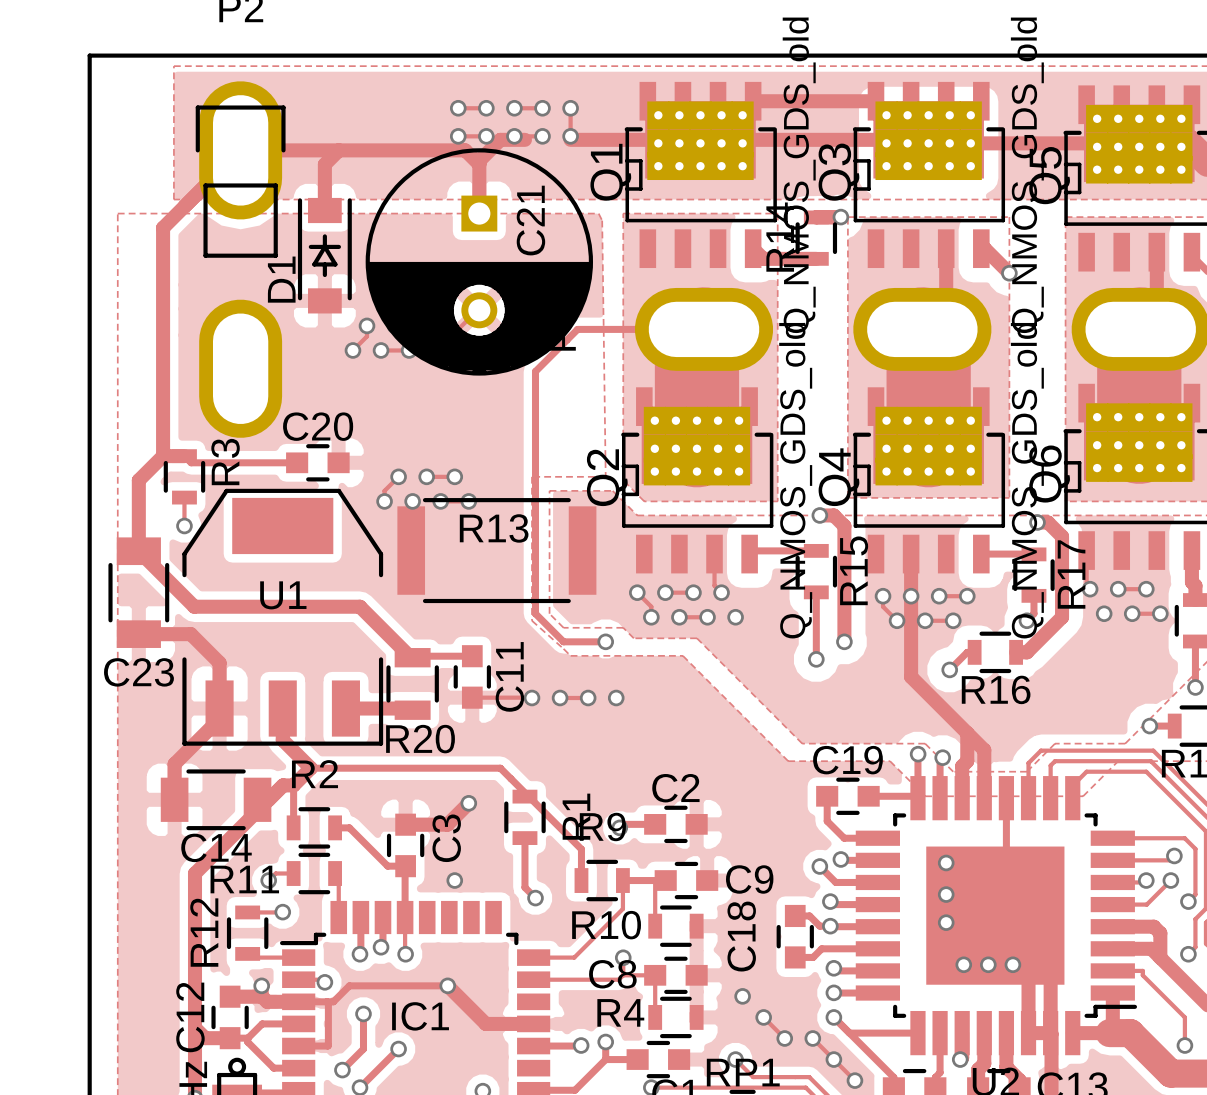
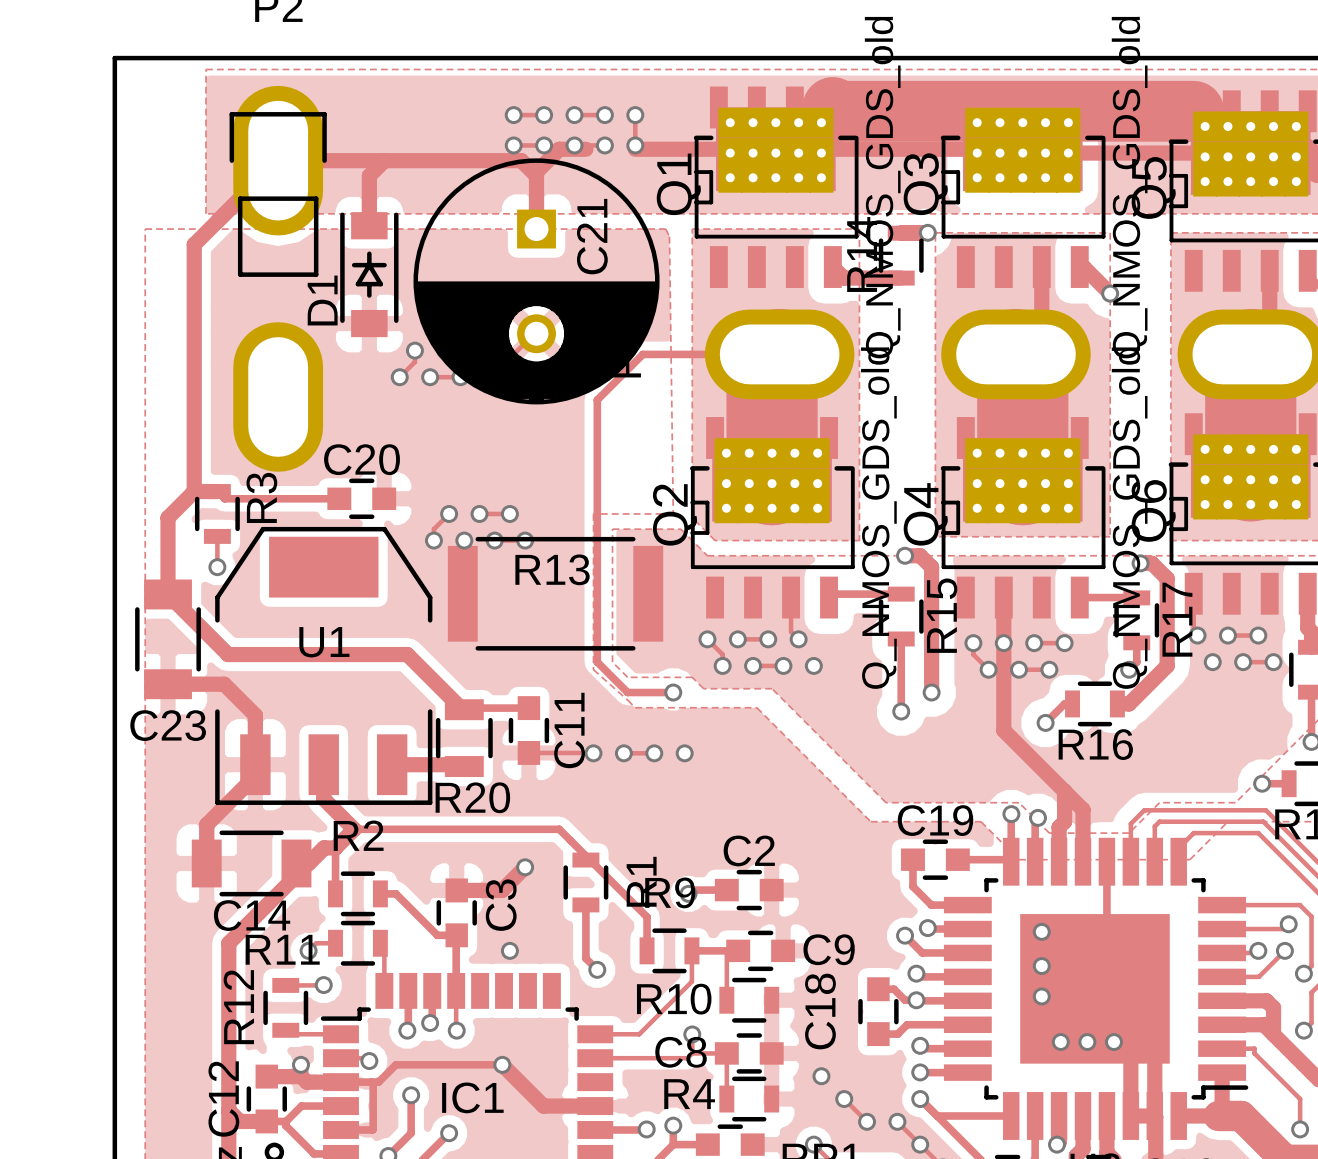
track: none -> (832, 107) (836, 111) (1193, 111)

